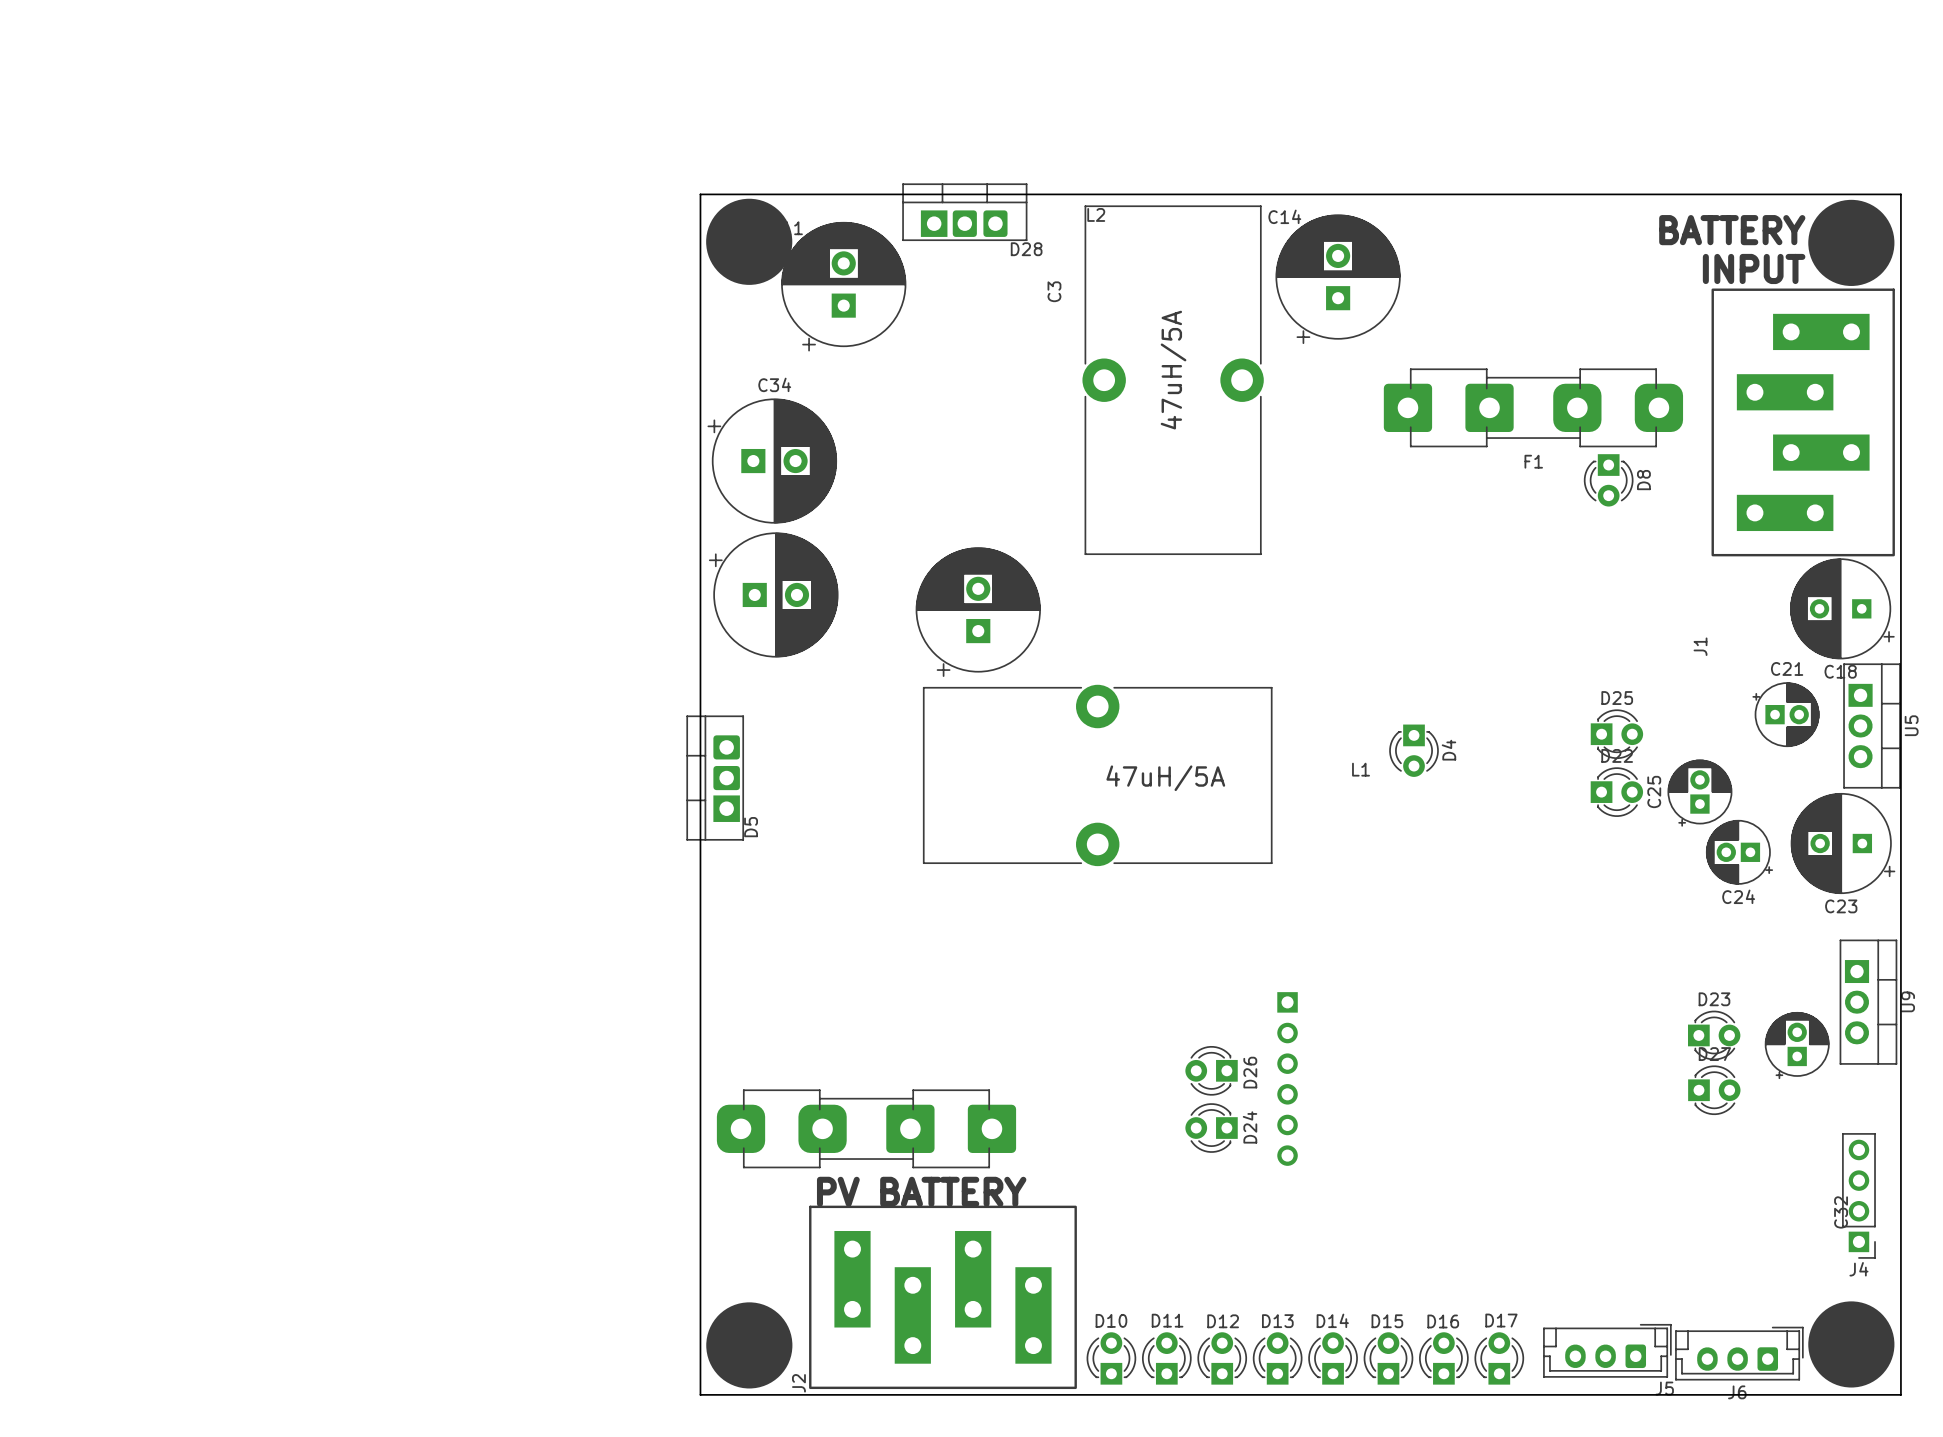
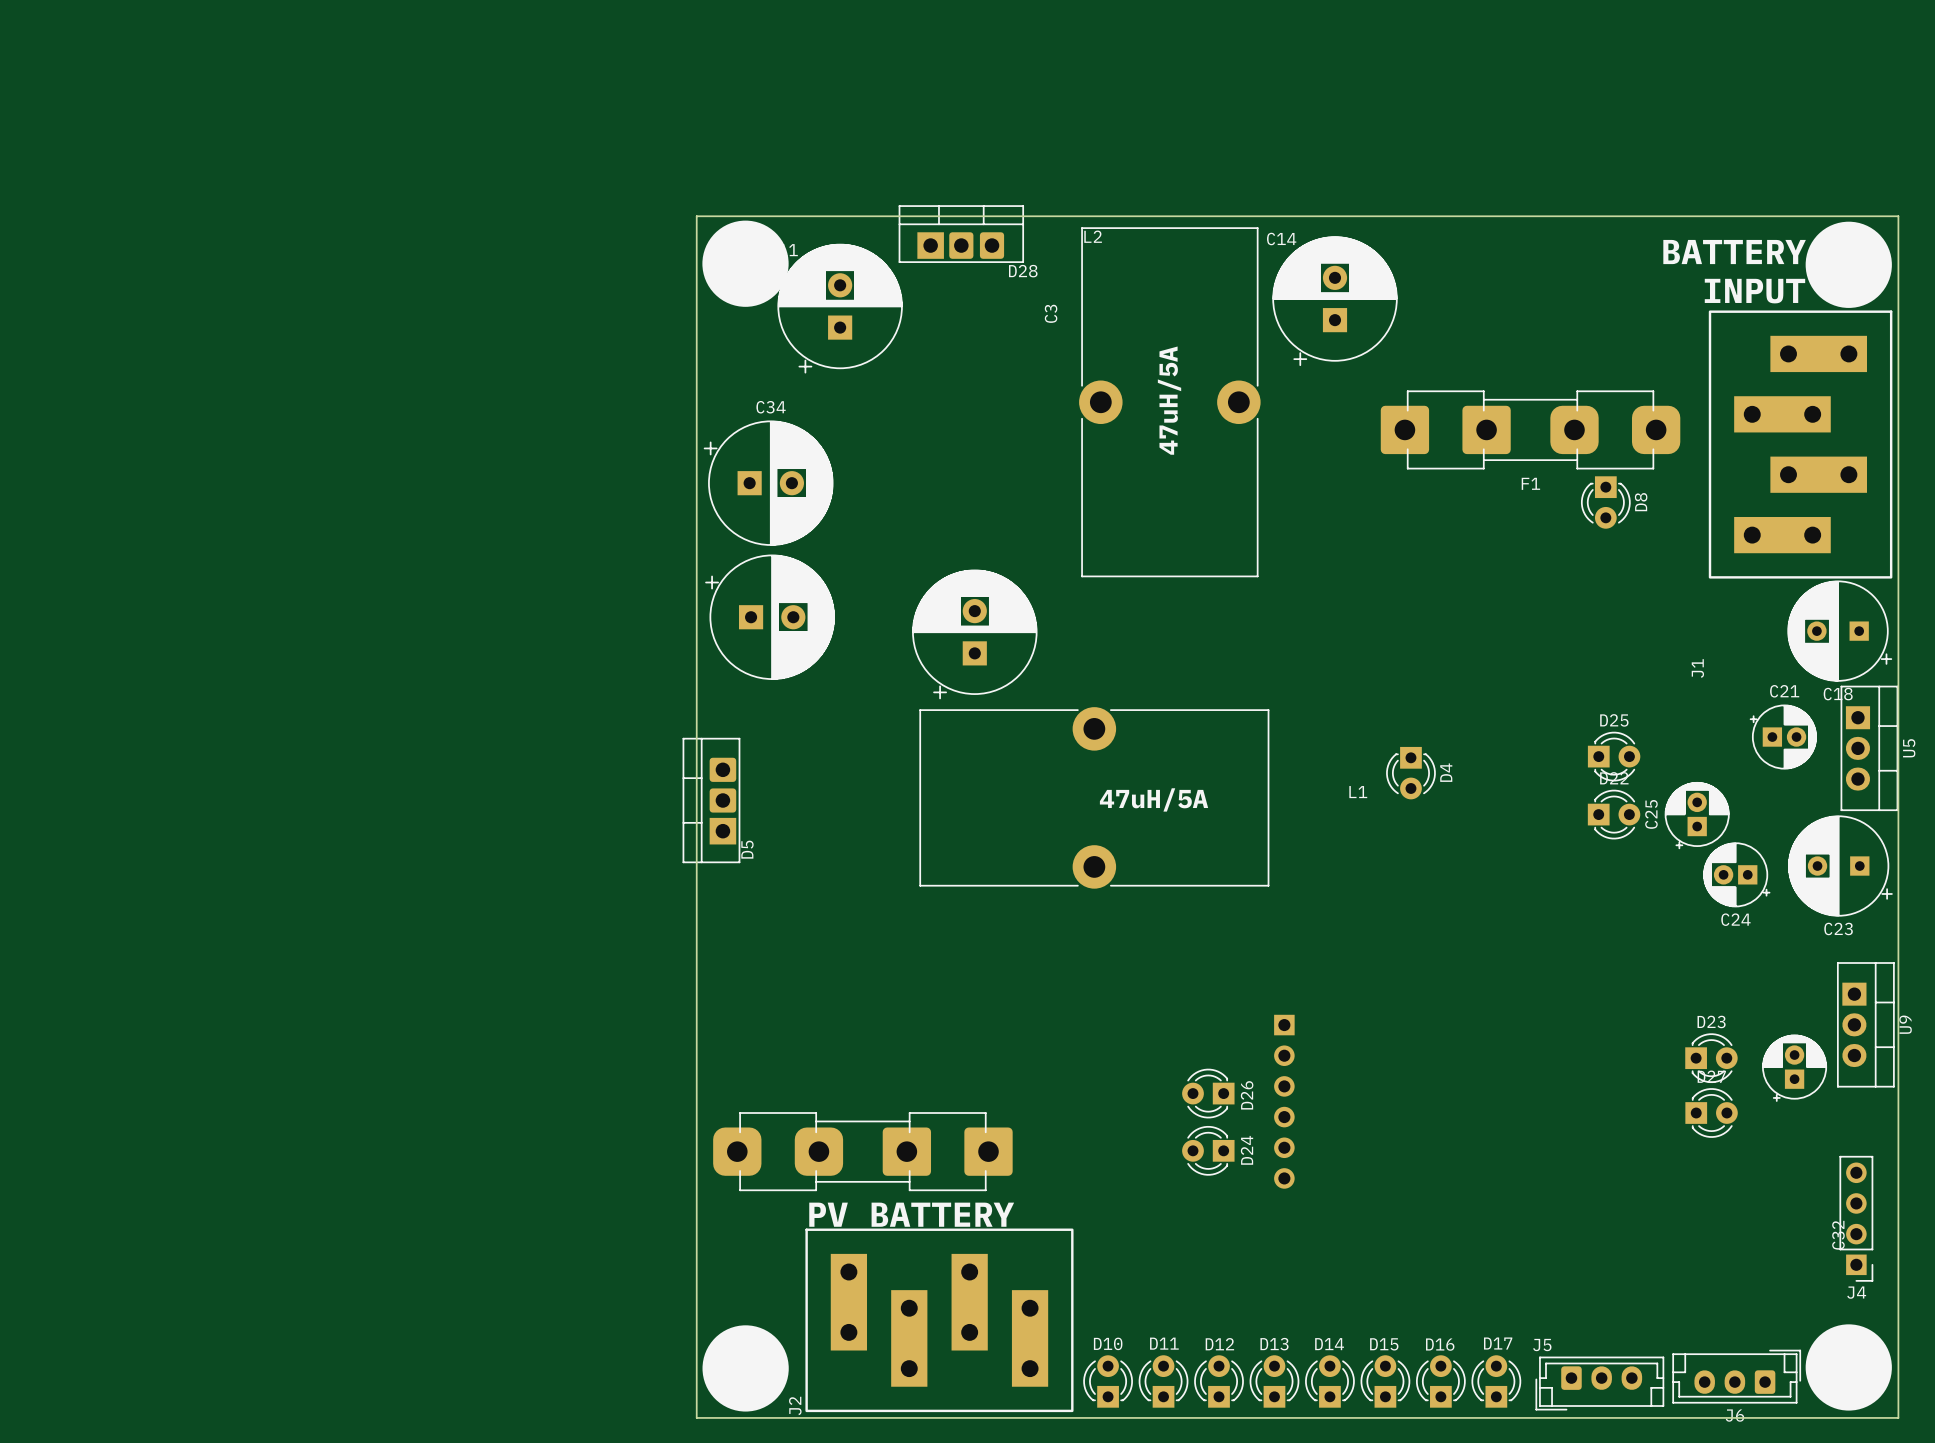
J5 rotation: 0° (1607, 1350) -> 180° (1599, 1383)

